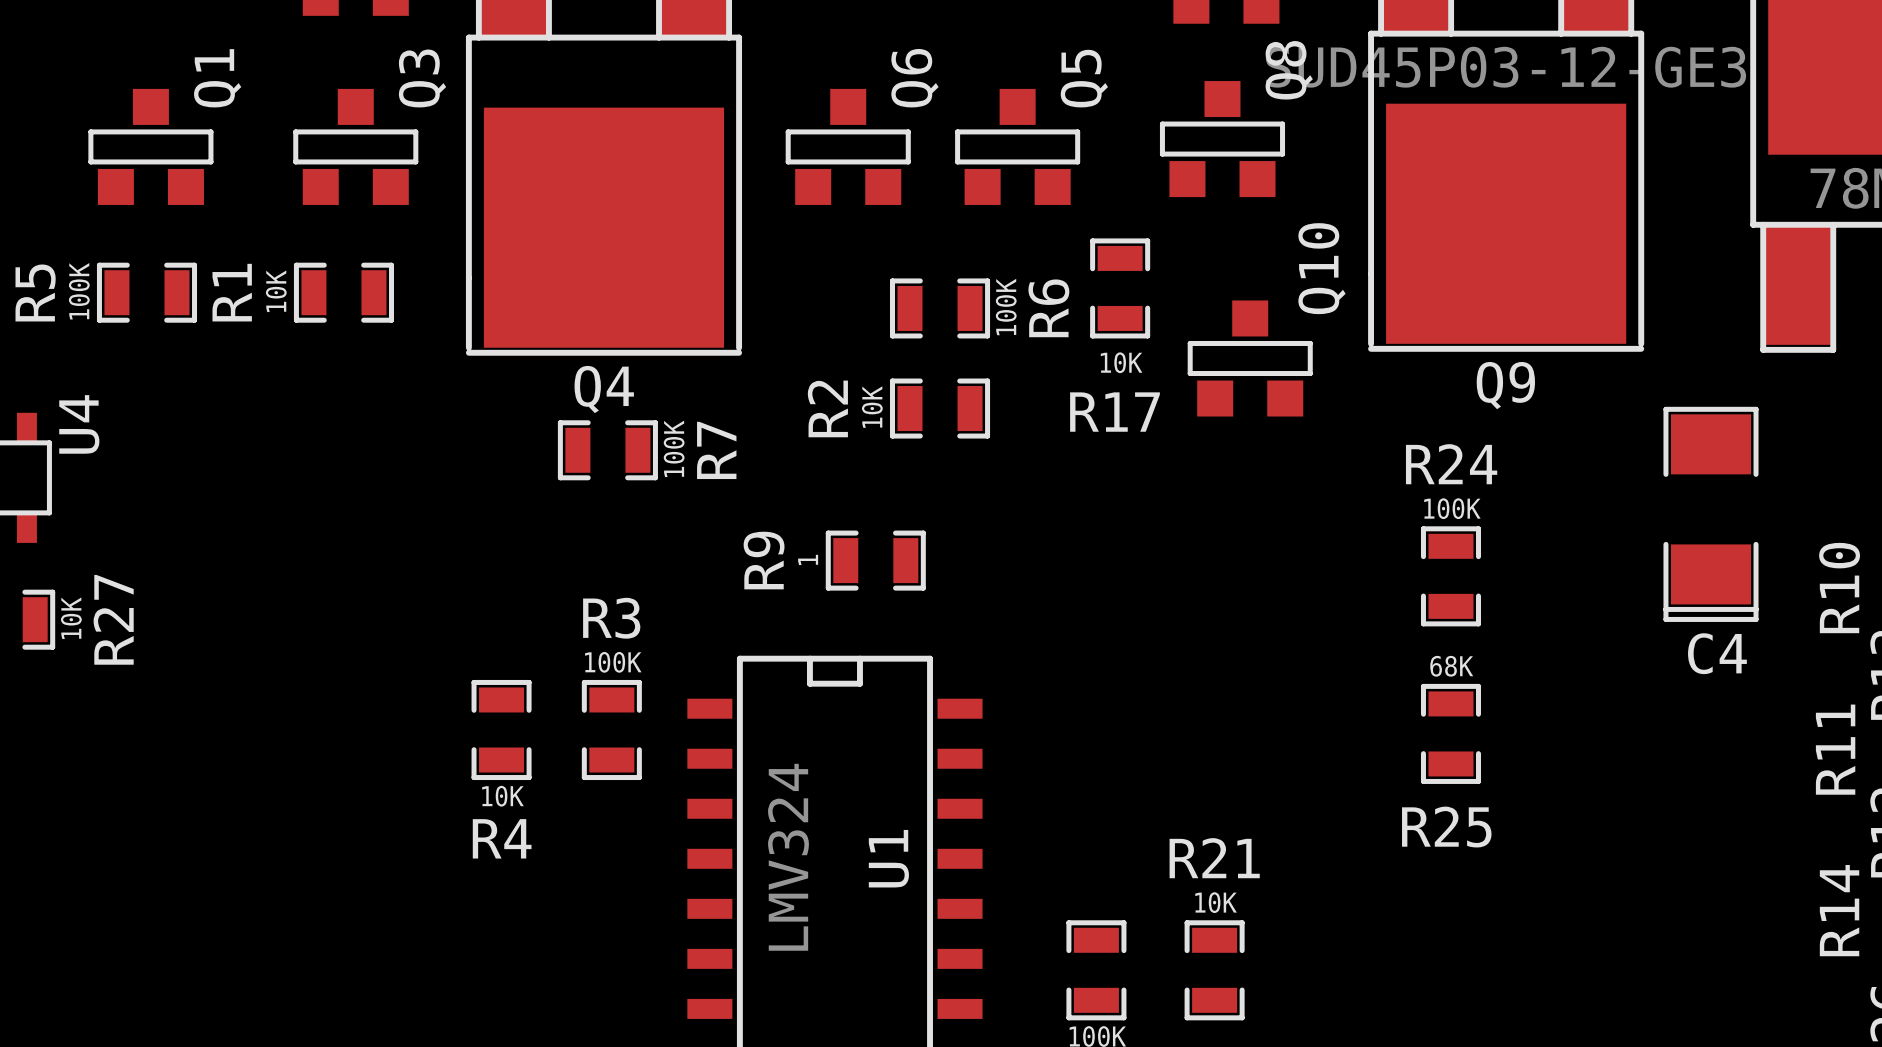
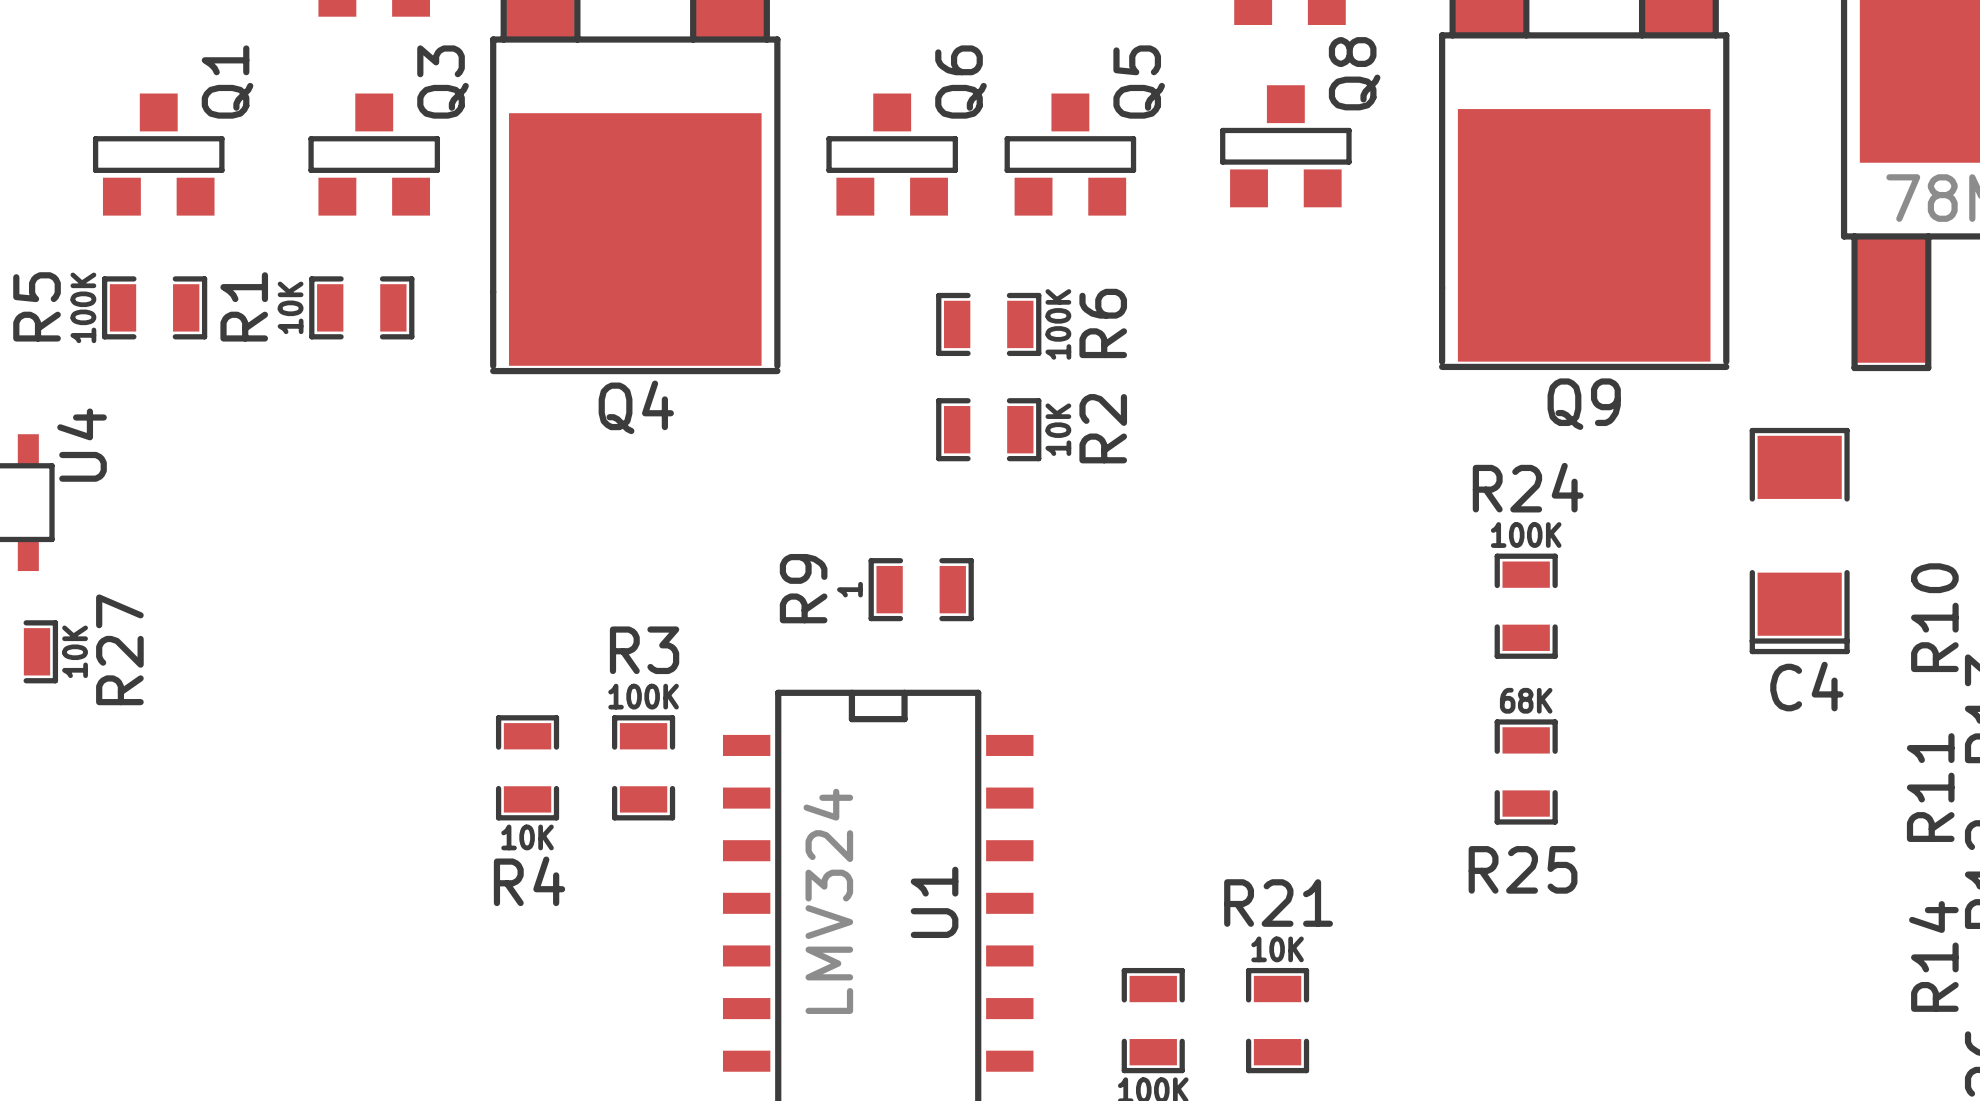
Q9 value: SUD45P03-12-GE3 (1505, 67) -> none
R17: 10K (1120, 288) -> none
Q10: (1250, 358) -> none
R2 value position: 10K (872, 407) -> 10K (1058, 429)
R2 name position: R2 (827, 408) -> R2 (1103, 428)
R7: 100K (607, 450) -> none

